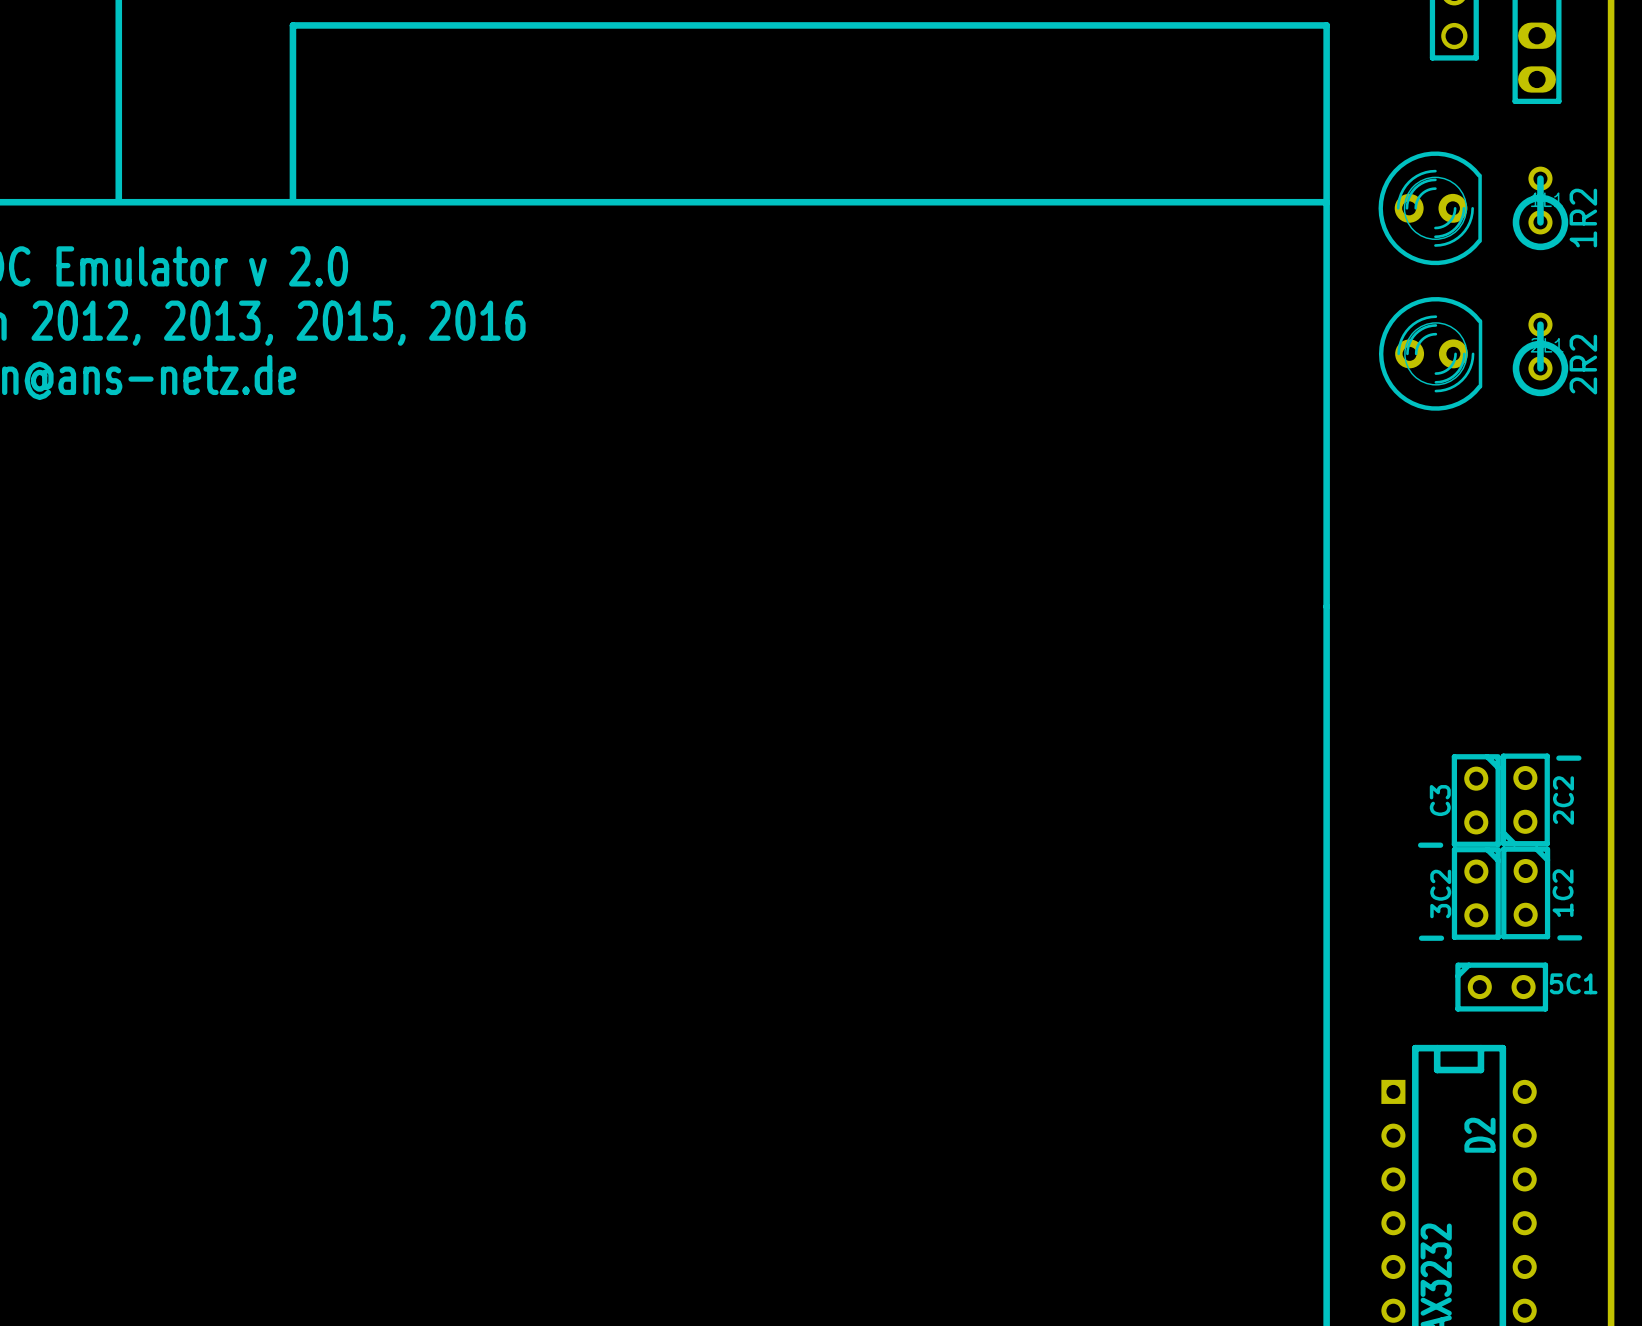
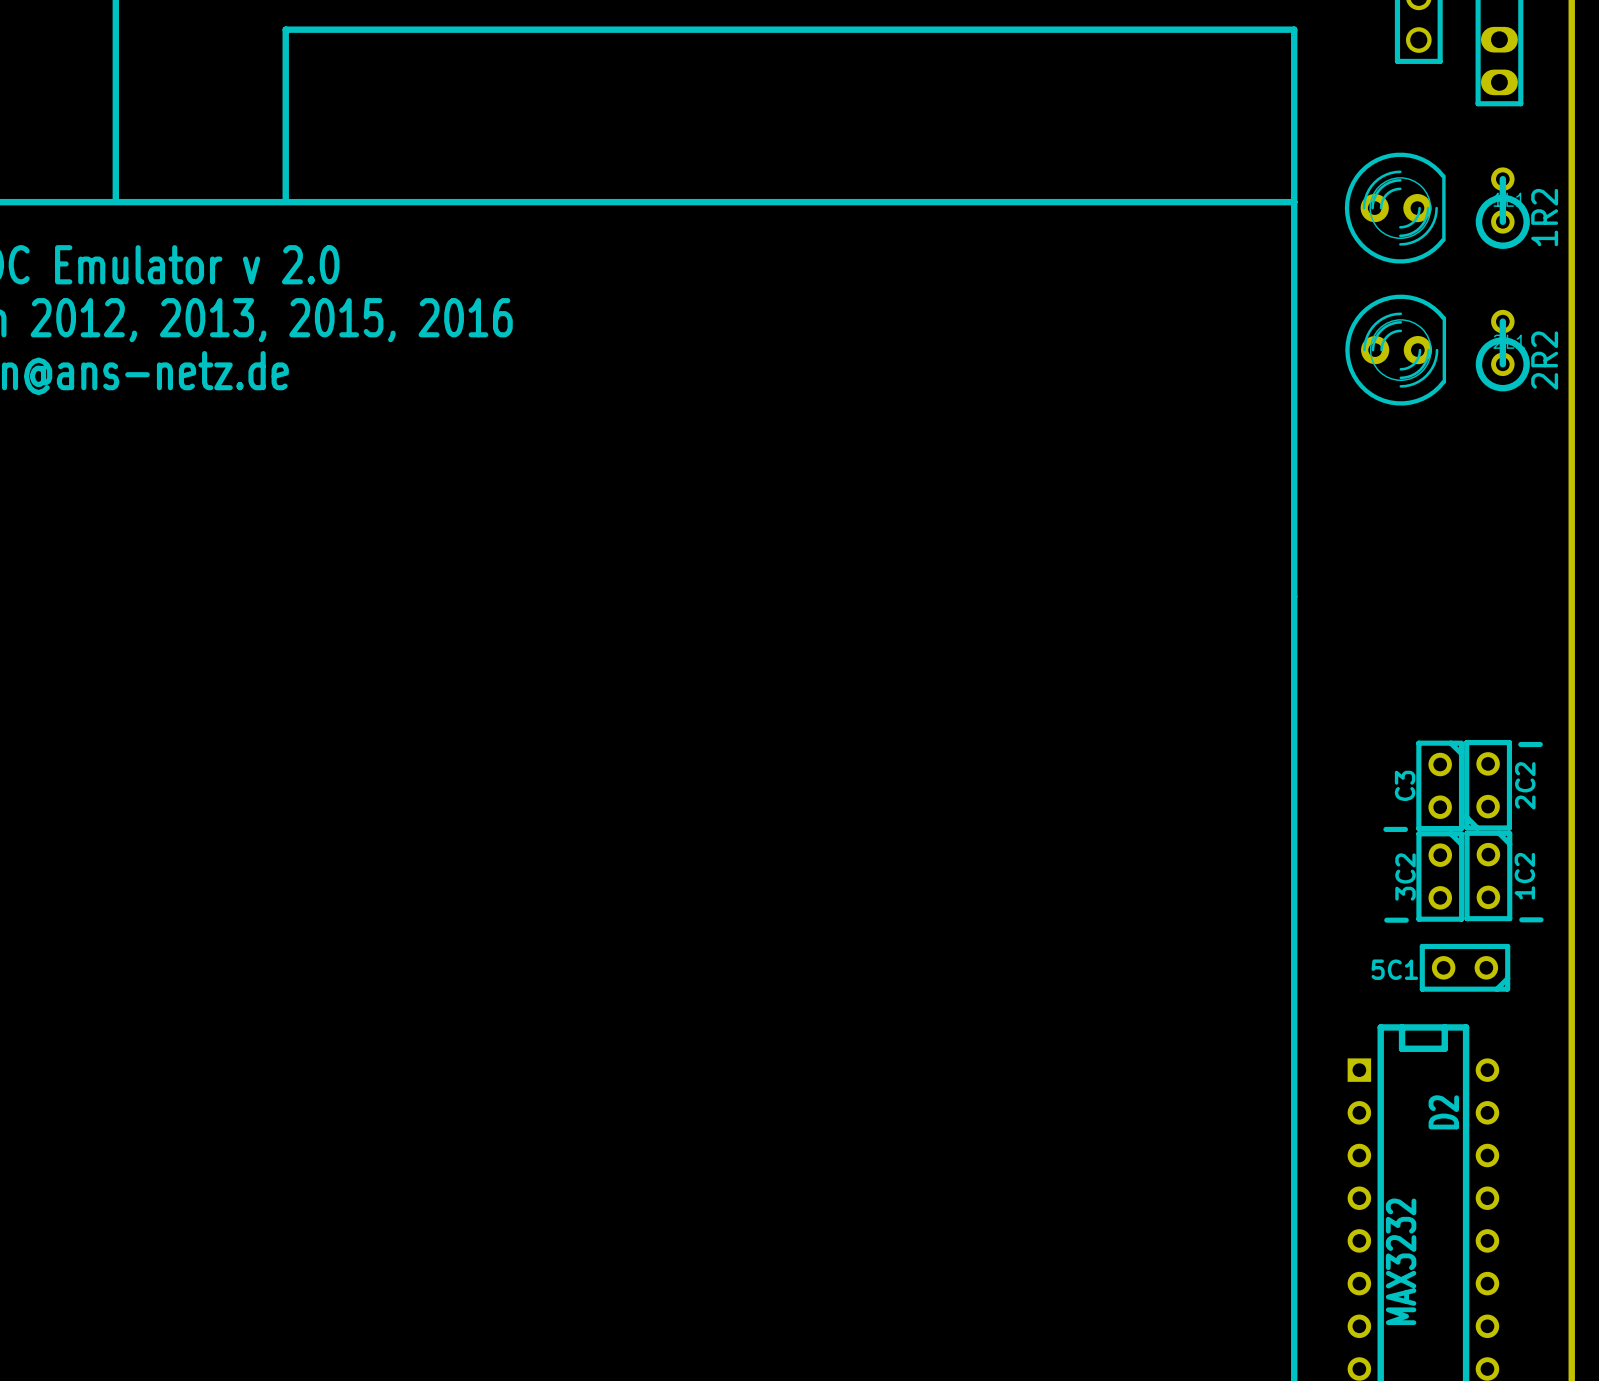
5C1 rotation: 0° (1501, 987) -> 180° (1464, 967)

